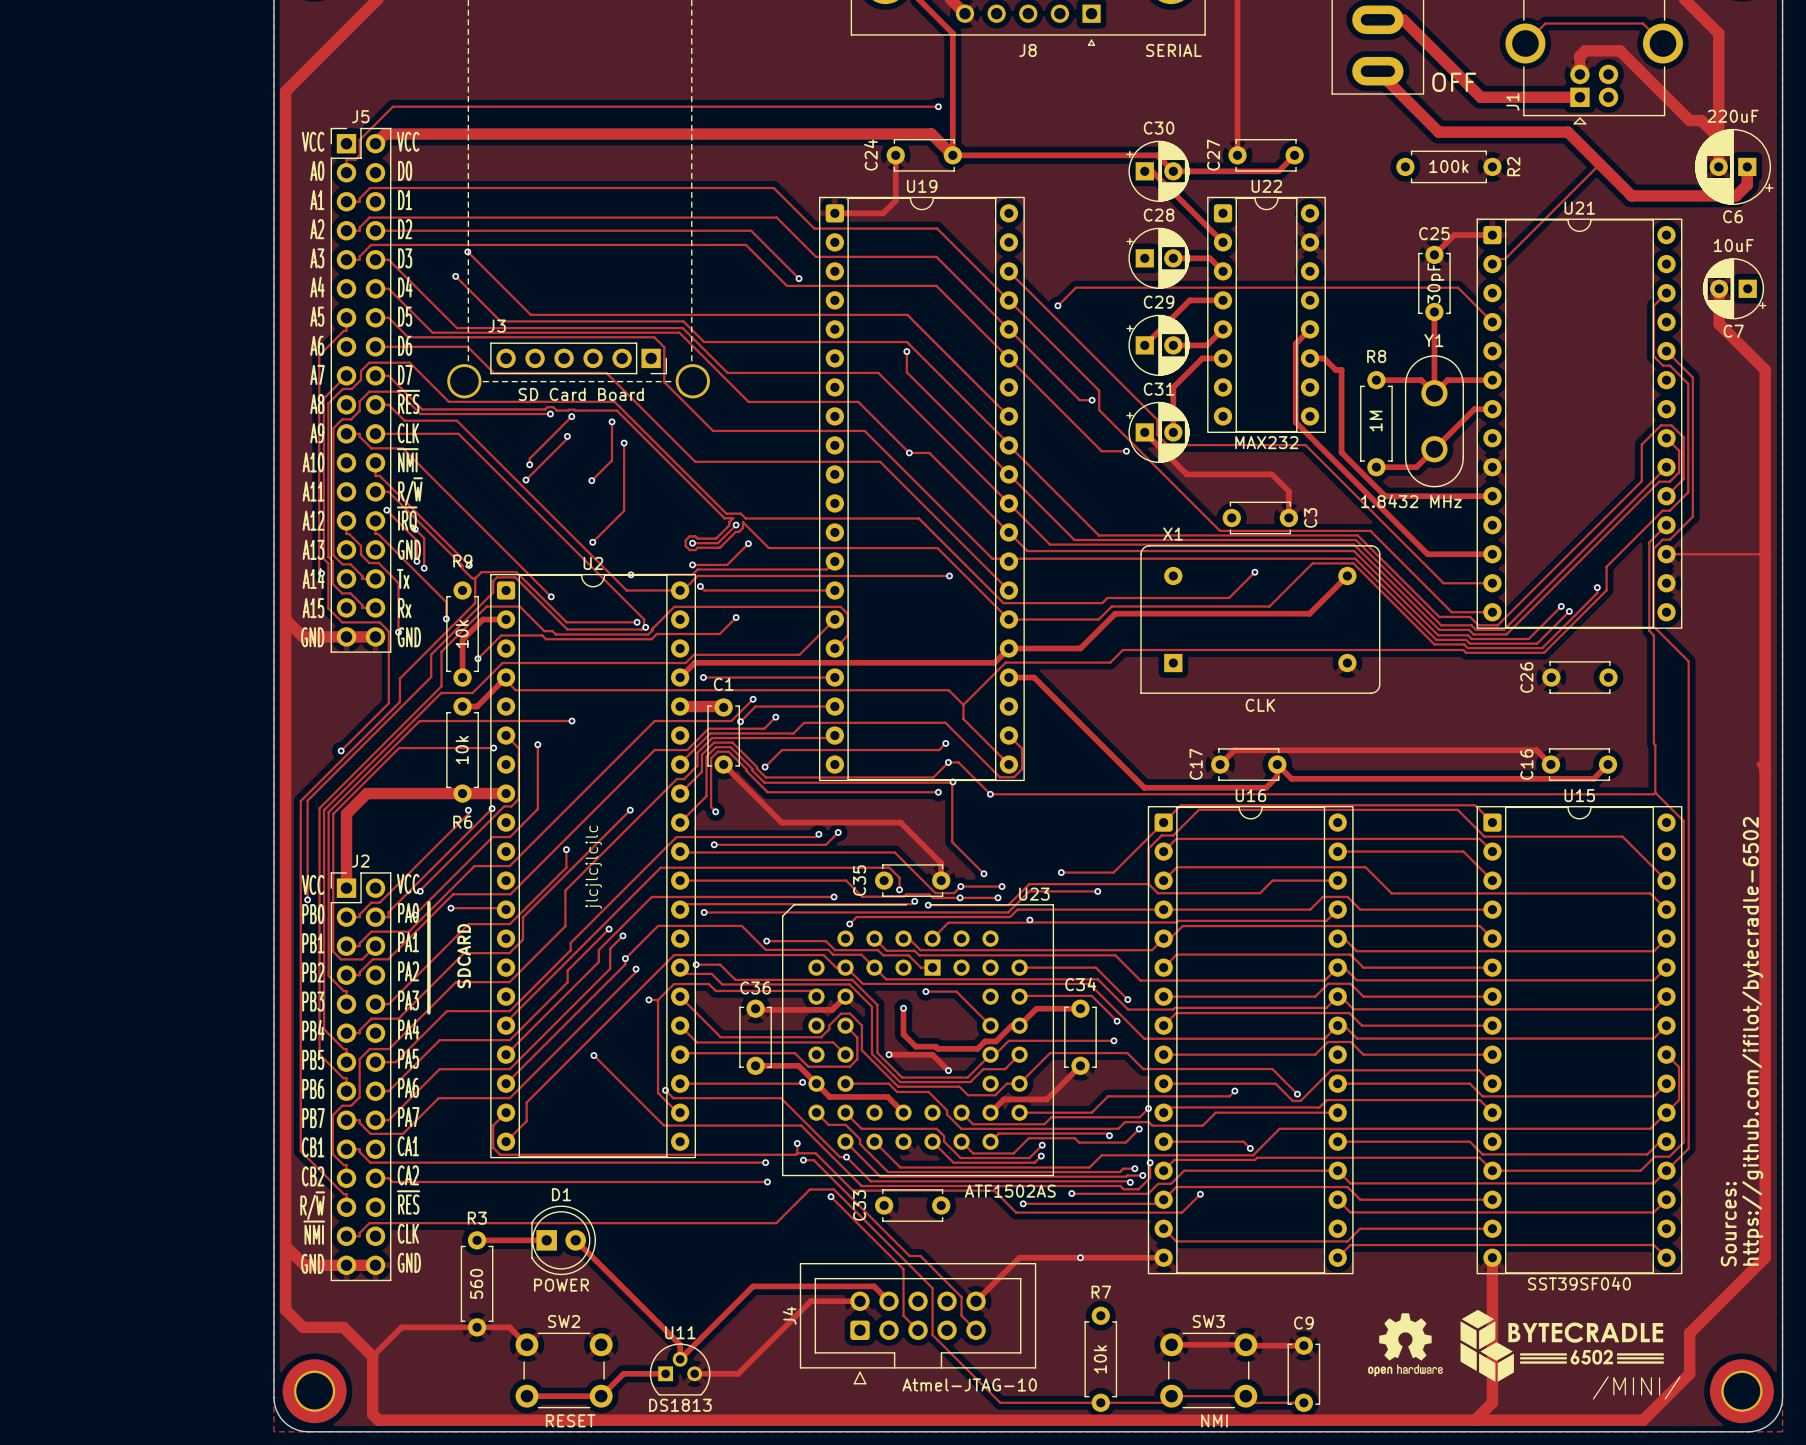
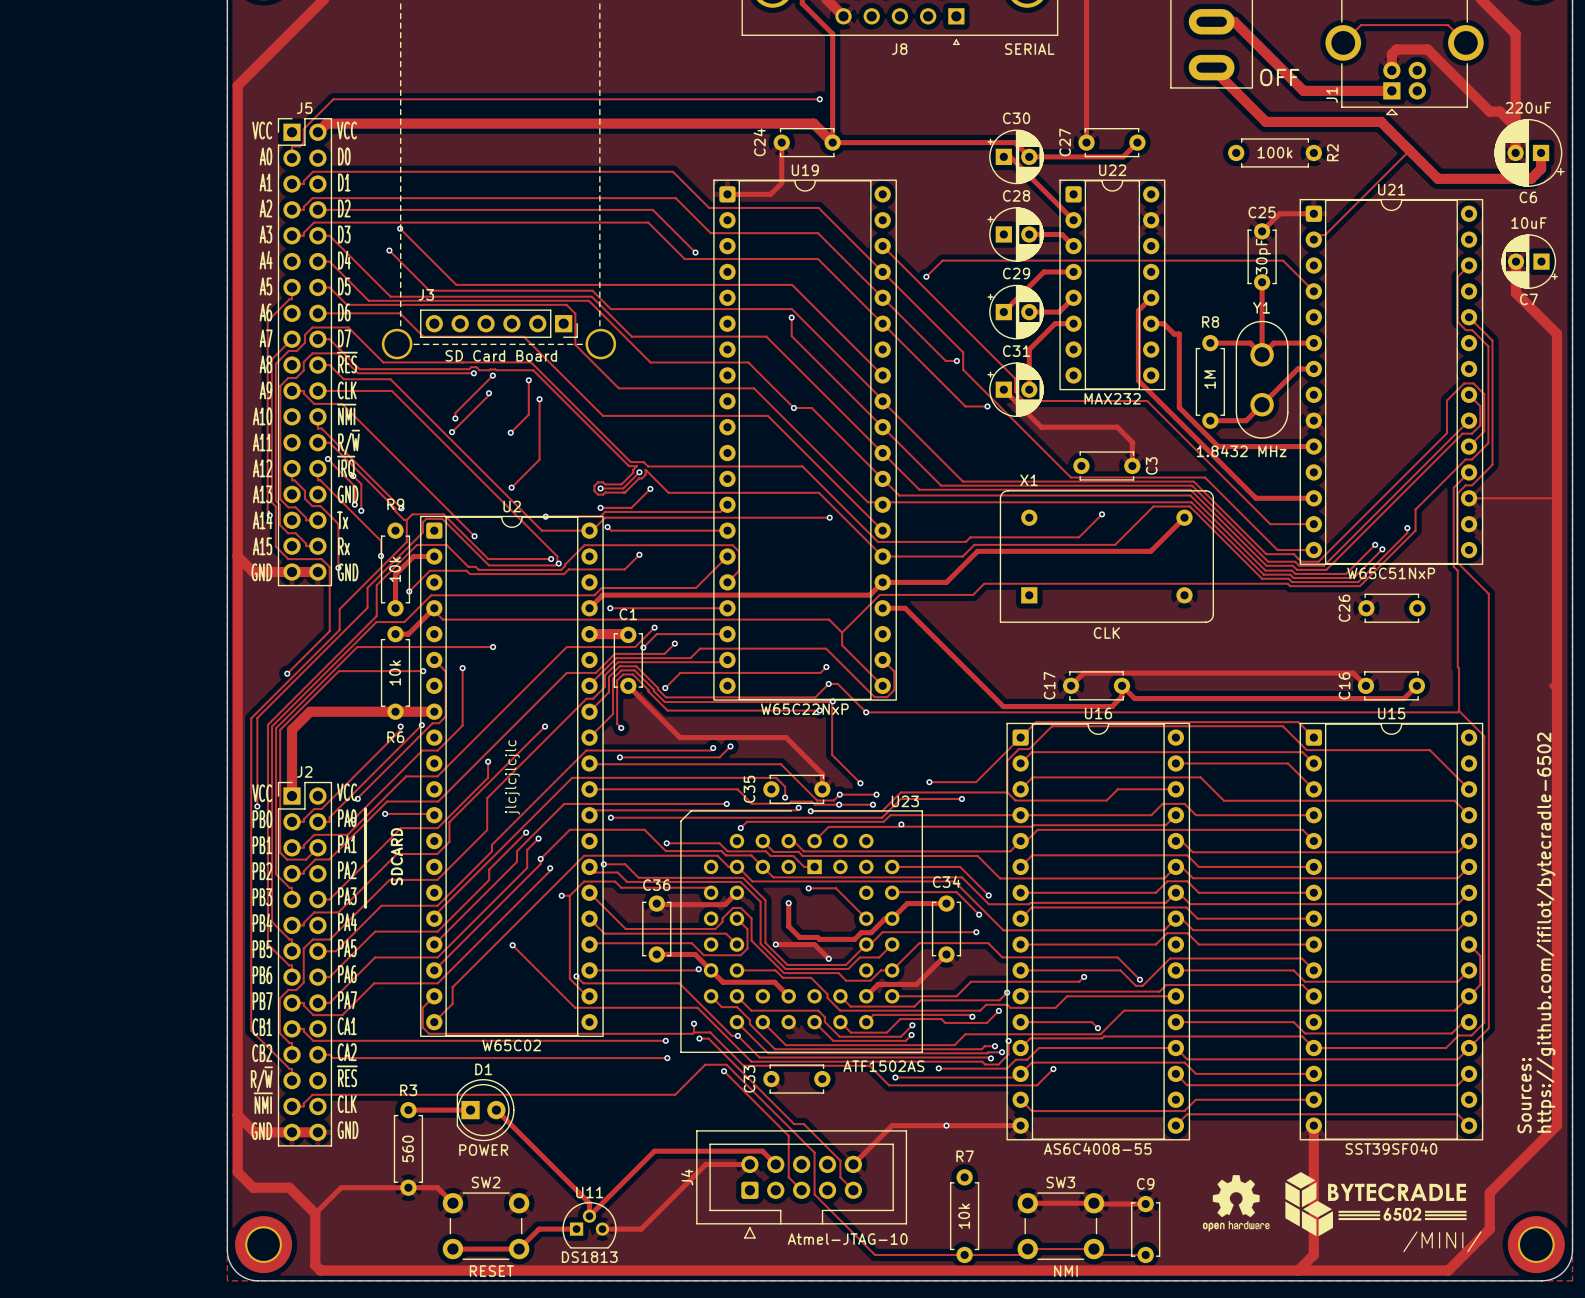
U21 value: none -> W65C51NxP (1391, 573)
U19 value: none -> W65C22NxP (804, 709)
U2 value: none -> W65C02 (511, 1045)
U16 value: none -> AS6C4008-55 (1097, 1148)

